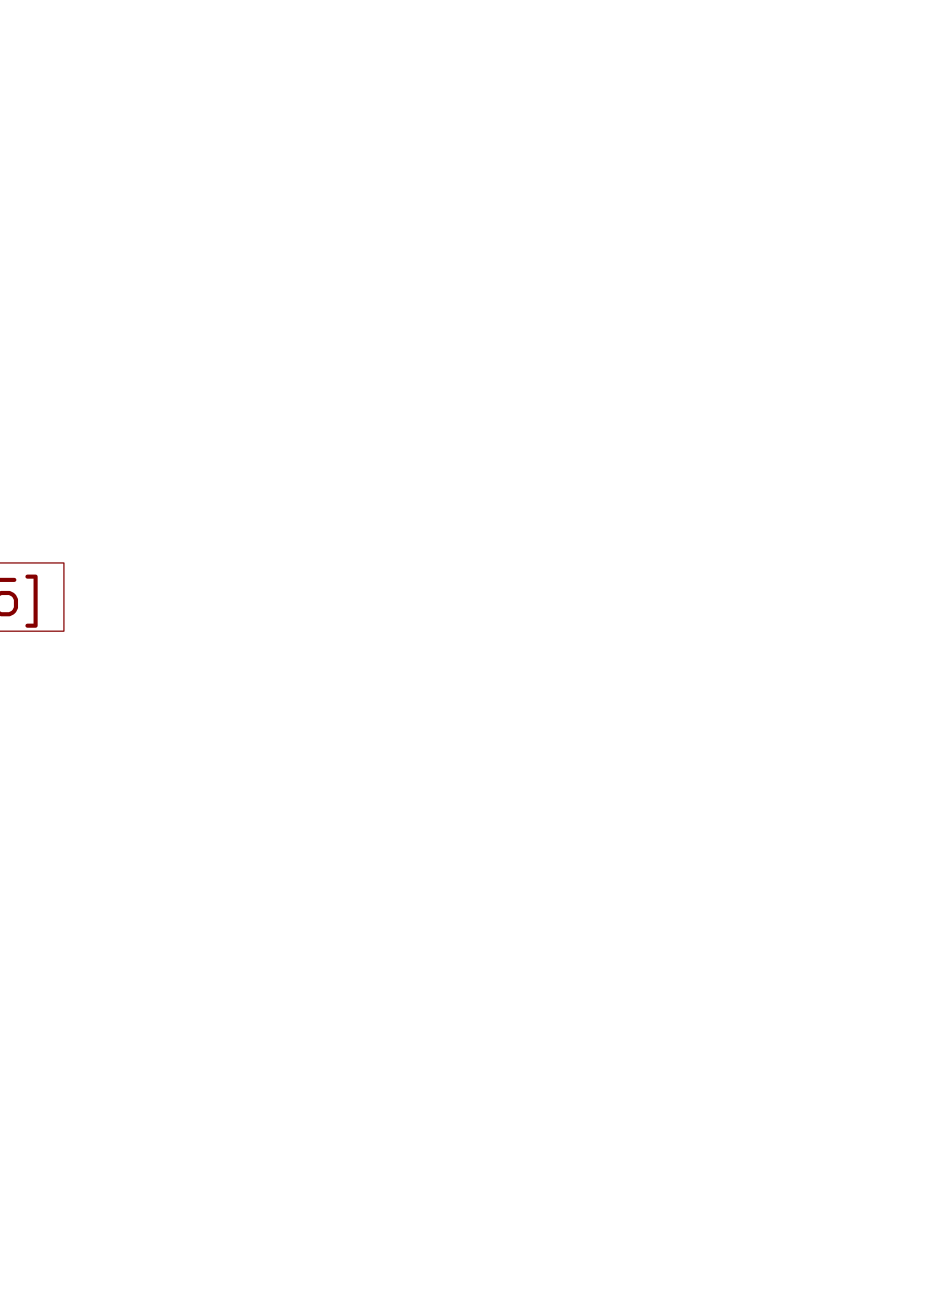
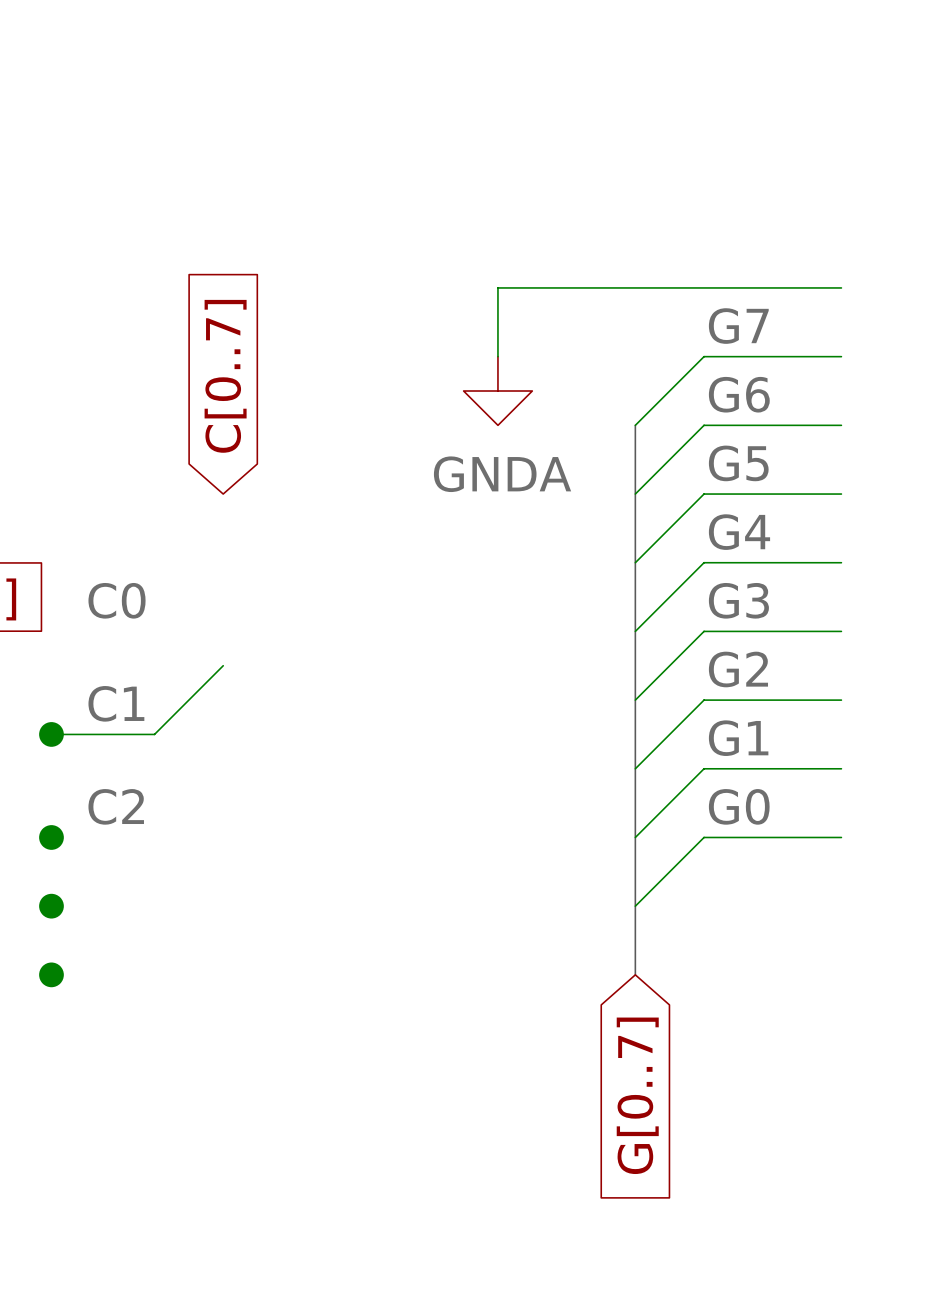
wire: none -> (841, 287) (497, 287) (497, 356)
label: none -> G7 (738, 326)
wire: none -> (841, 356) (704, 356) (635, 425)
global label: none -> C[0..7] (225, 376)
power symbol: none -> GNDA (497, 391)
label: none -> G6 (739, 394)
bus: none -> (635, 425) (635, 974)
wire: none -> (841, 425) (704, 425) (635, 494)
label: none -> G5 (738, 463)
wire: none -> (841, 494) (704, 494) (635, 562)
label: none -> G4 (739, 532)
wire: none -> (841, 562) (704, 562) (635, 631)
label: none -> C0 (117, 600)
label: none -> G3 (738, 600)
wire: none -> (841, 631) (704, 631) (635, 700)
wire: none -> (223, 665) (154, 734) (51, 734)
label: none -> G2 (738, 669)
wire: none -> (841, 700) (704, 700) (635, 768)
label: none -> C1 (116, 703)
junction: none -> (51, 734)
label: none -> G1 (738, 738)
wire: none -> (841, 768) (704, 768) (635, 837)
label: none -> C2 (116, 806)
label: none -> G0 (739, 806)
junction: none -> (51, 837)
wire: none -> (841, 837) (704, 837) (635, 906)
junction: none -> (51, 906)
junction: none -> (51, 974)
global label: none -> G[0..7] (637, 1095)

